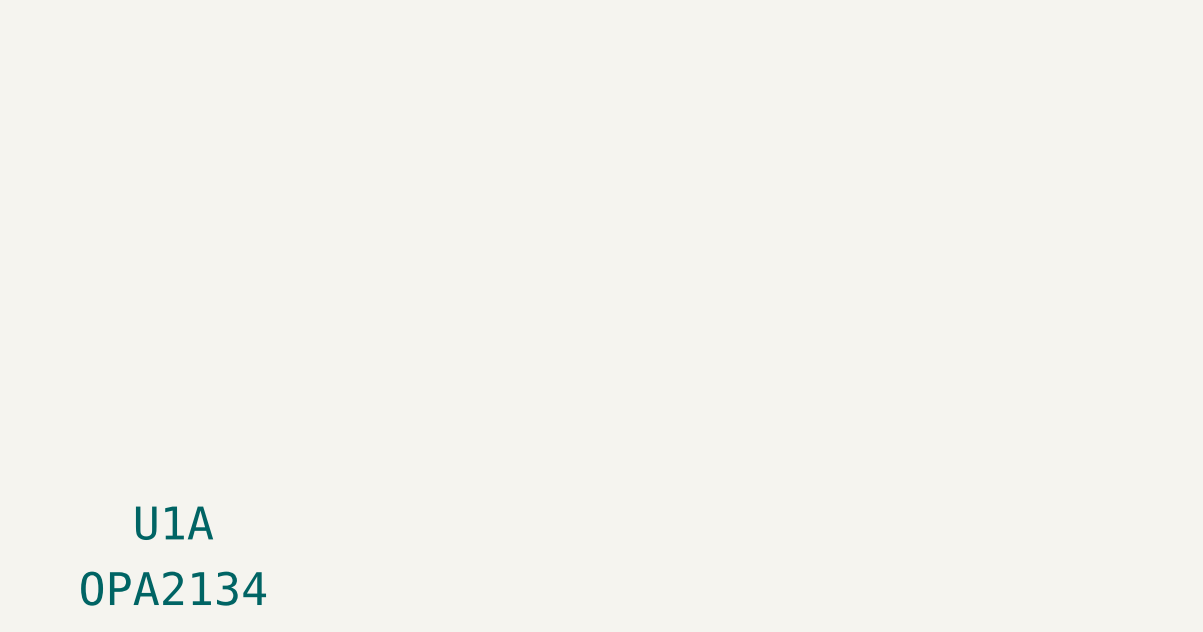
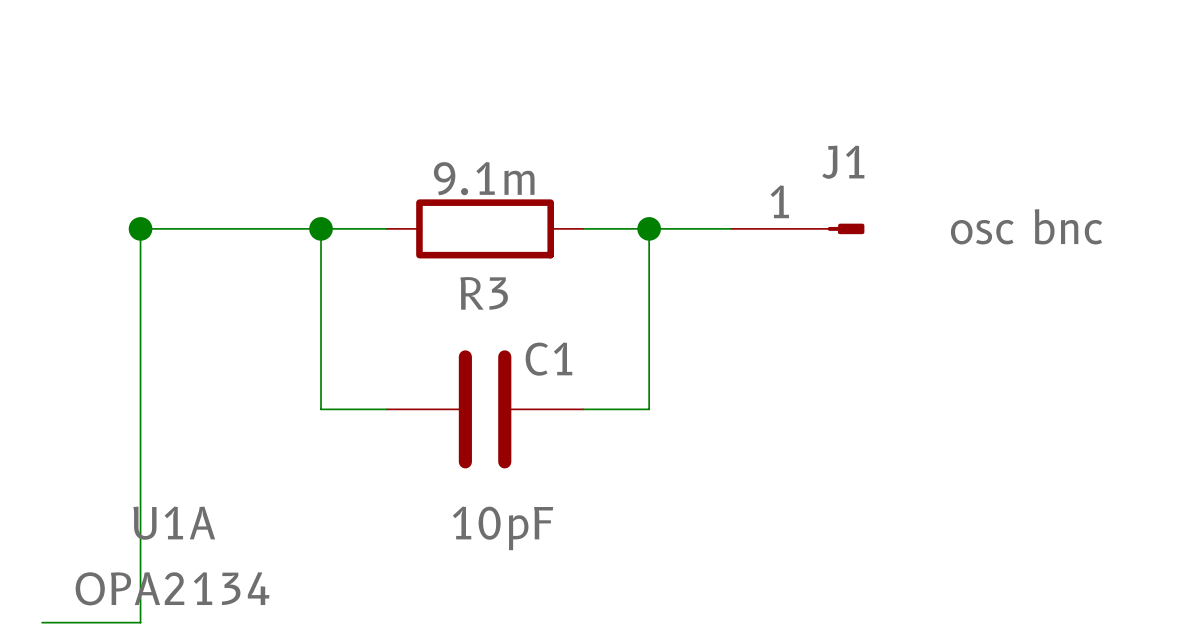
junction: none -> (140, 228)
wire: none -> (321, 228) (321, 409) (386, 409)
junction: none -> (321, 228)
wire: none -> (386, 228) (140, 228) (140, 622) (42, 622)
R3: none -> 9.1m (485, 228)
wire: none -> (583, 228) (731, 228)
wire: none -> (649, 228) (649, 409) (583, 409)
junction: none -> (649, 228)
J1: none -> osc bnc (797, 228)
C1: none -> 10pF (485, 409)

